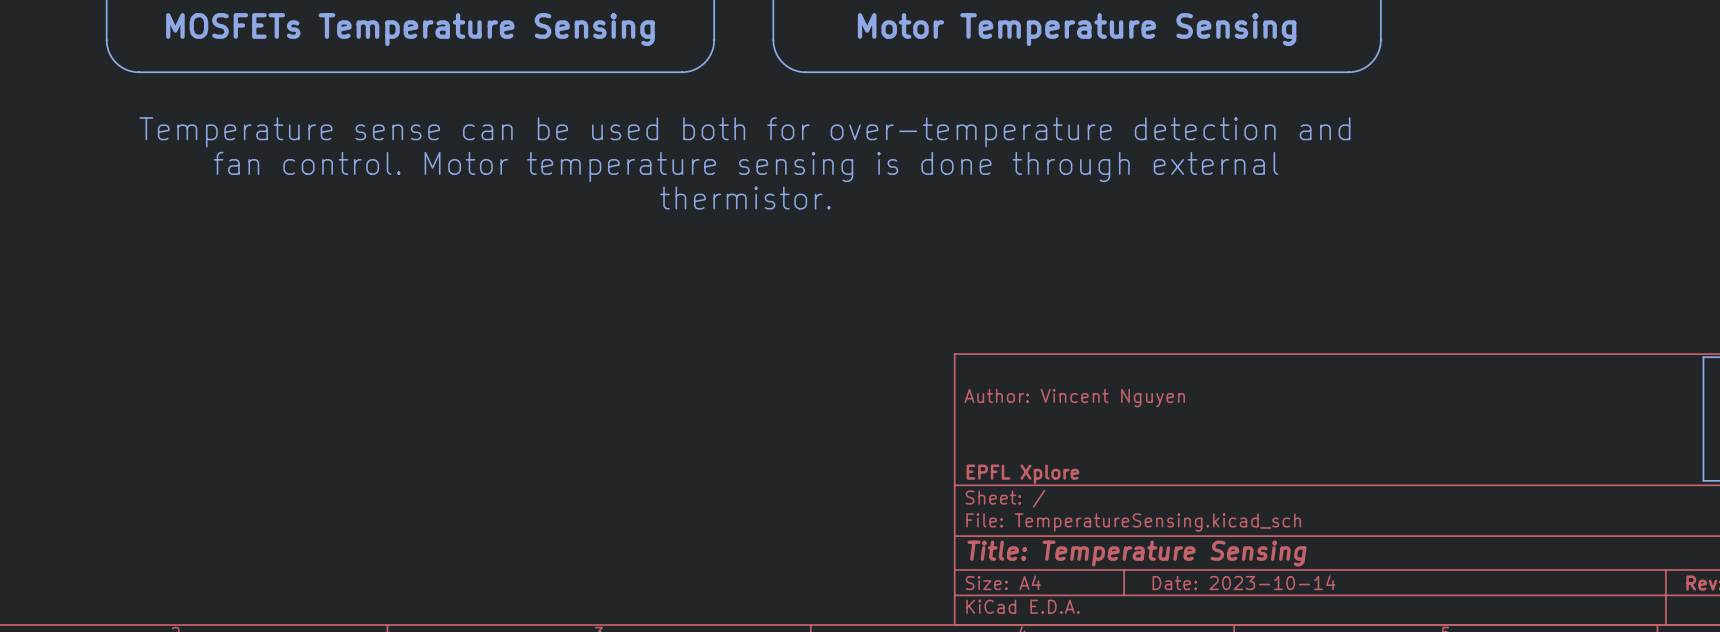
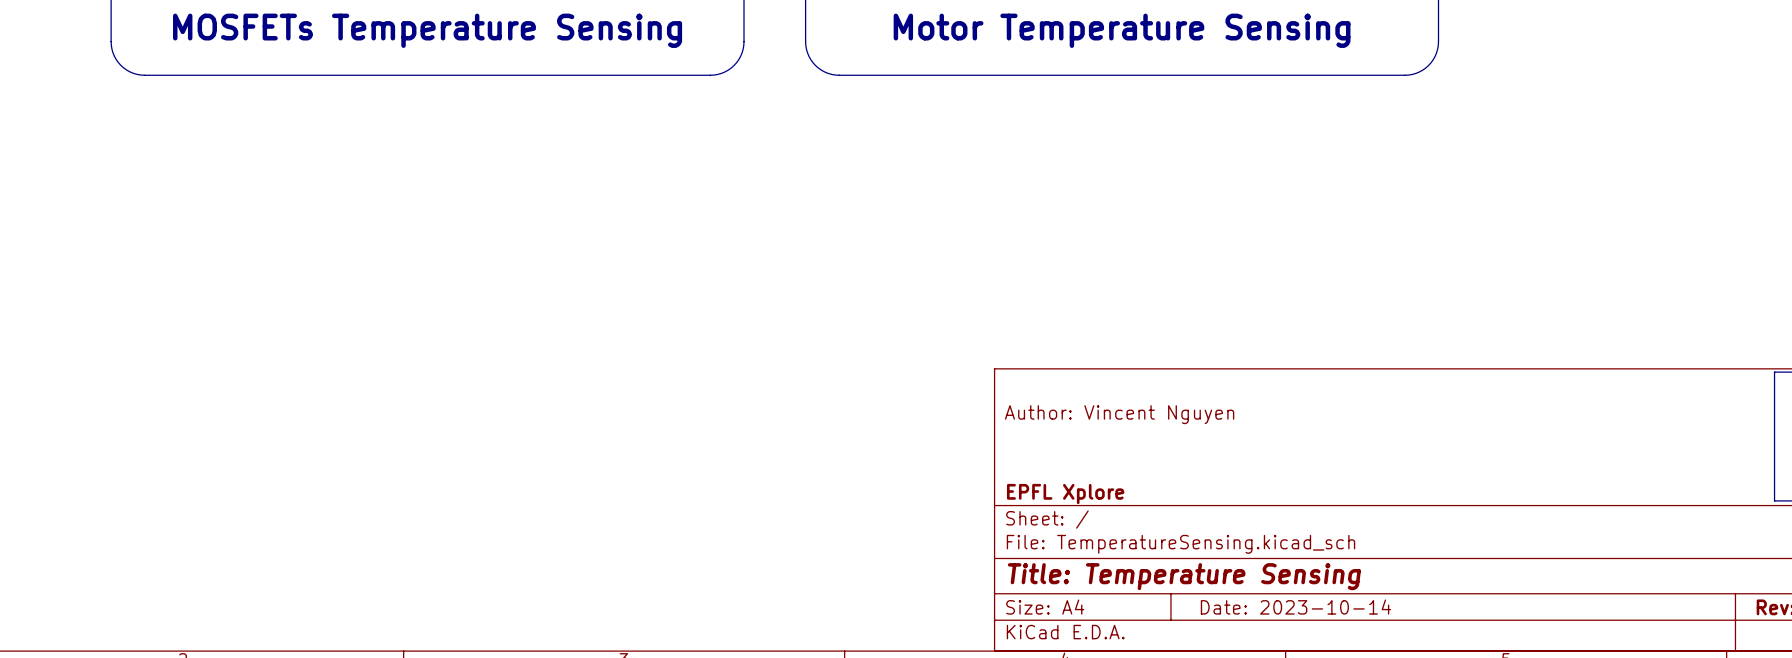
text: Temperature sense can be used both for over-temperature detection and (744, 132) -> none
text: fan control. Motor temperature sensing is done through external (745, 166) -> none
text: thermistor. (745, 198) -> none

